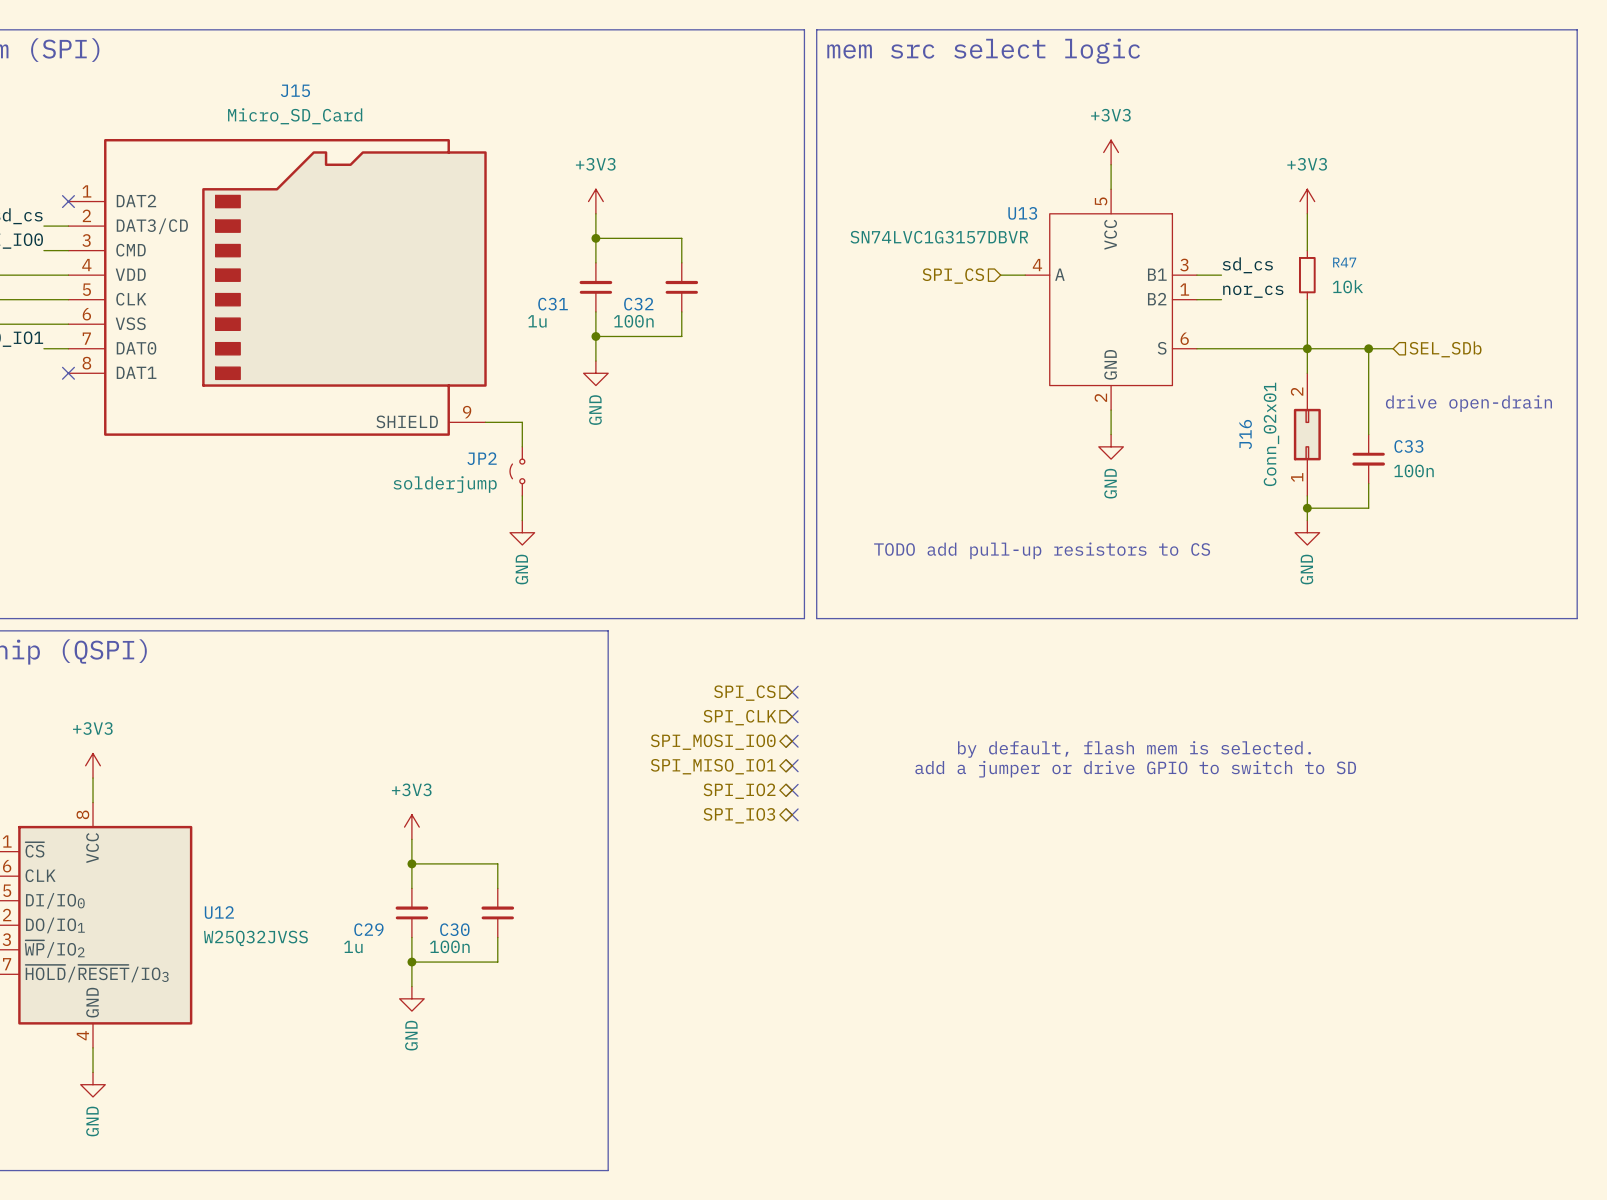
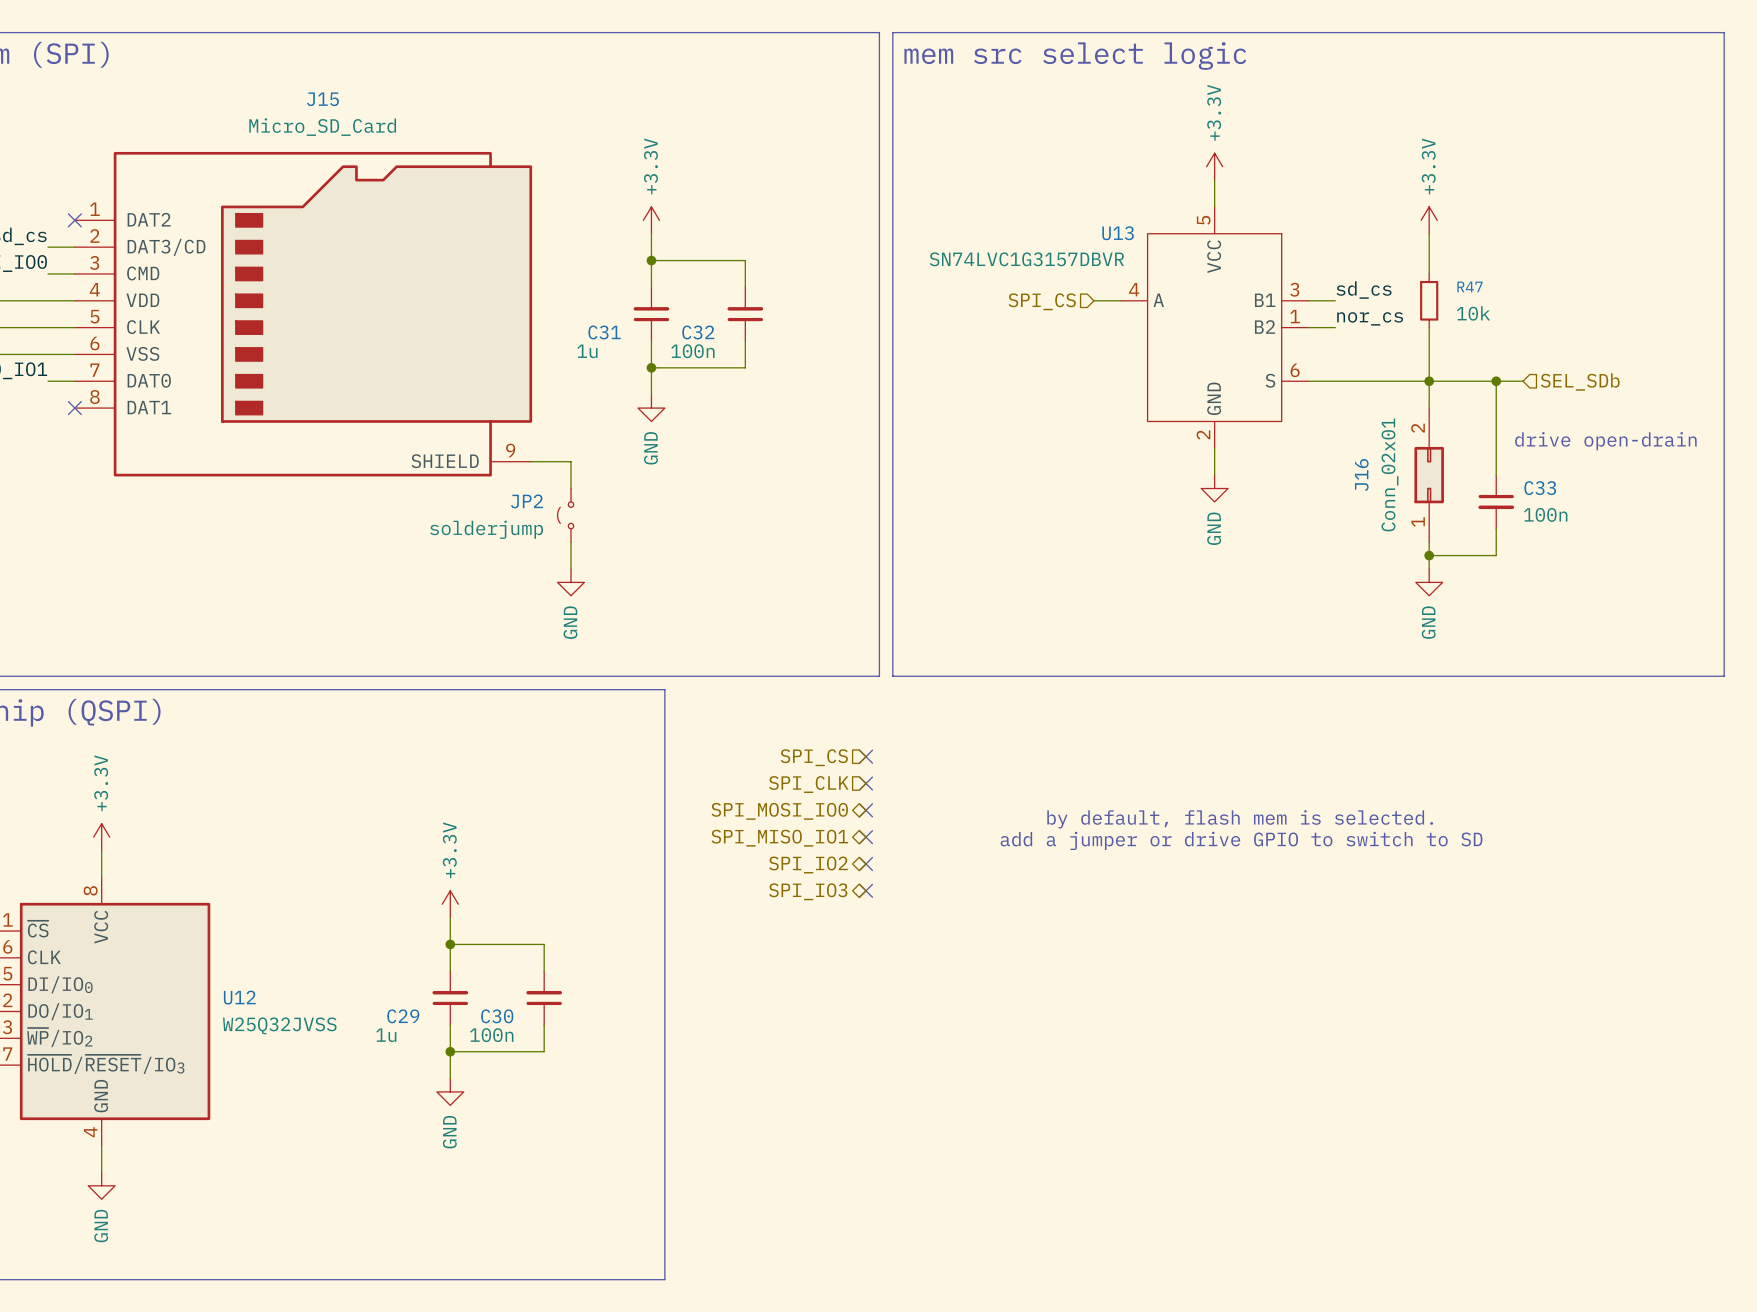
power symbol: +3V3 (1111, 152) -> +3.3V (1214, 166)
power symbol: +3V3 (595, 201) -> +3.3V (651, 220)
power symbol: +3V3 (1307, 201) -> +3.3V (1429, 220)
text: TODO add pull-up resistors to CS (1042, 550) -> none
power symbol: +3V3 (93, 765) -> +3.3V (101, 837)
power symbol: +3V3 (411, 827) -> +3.3V (450, 904)

